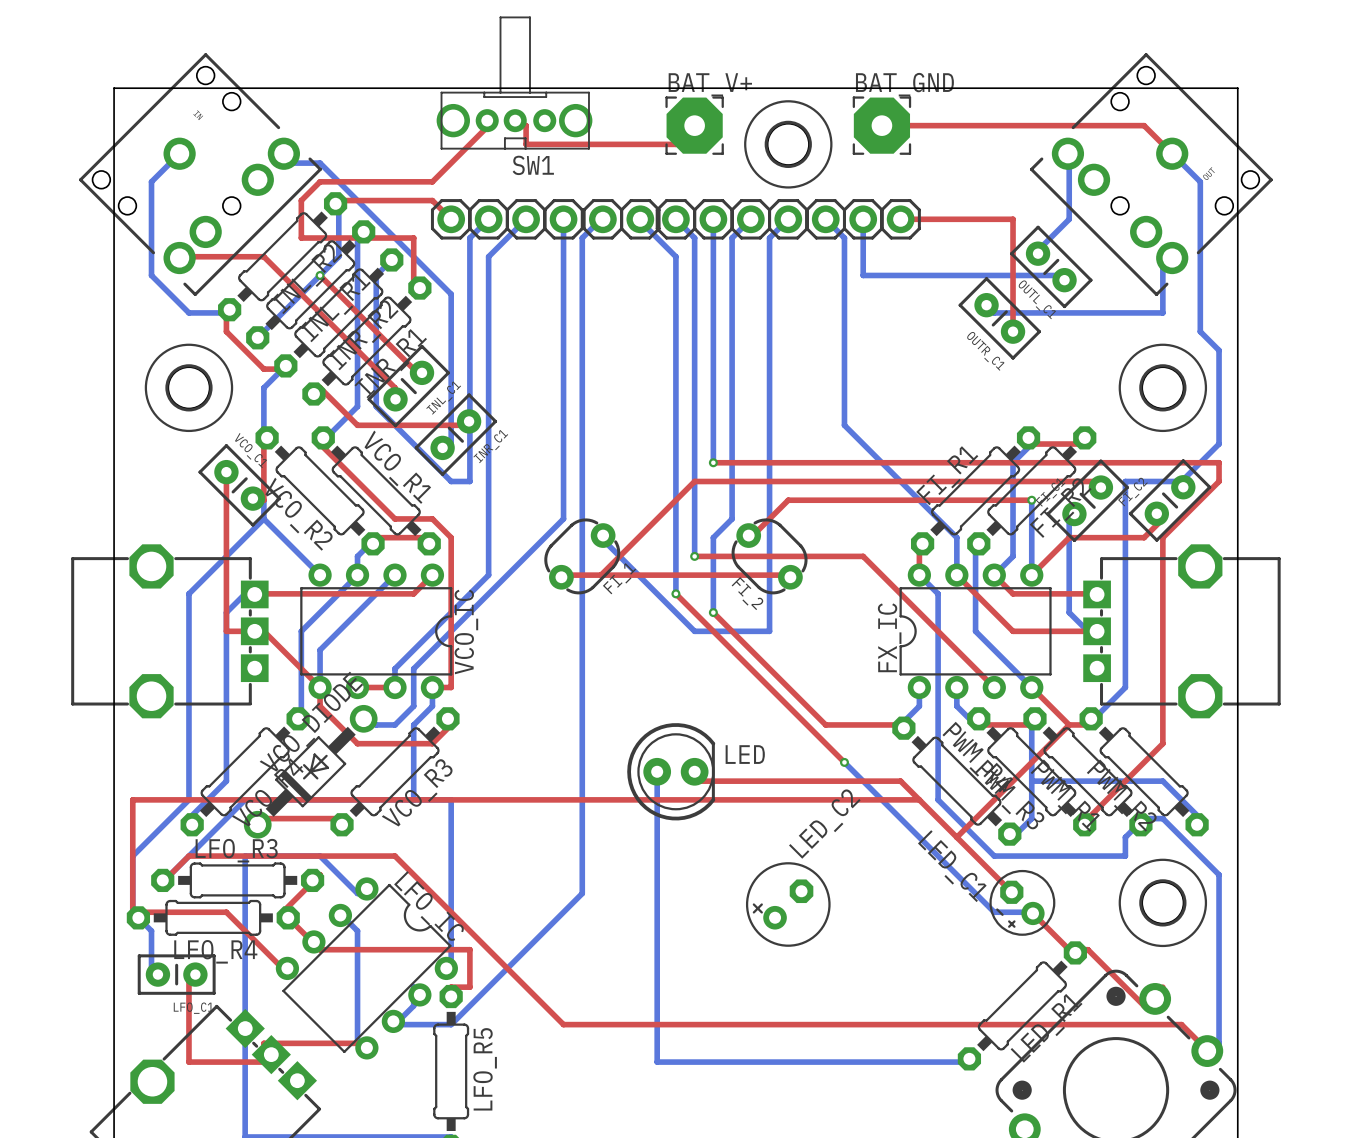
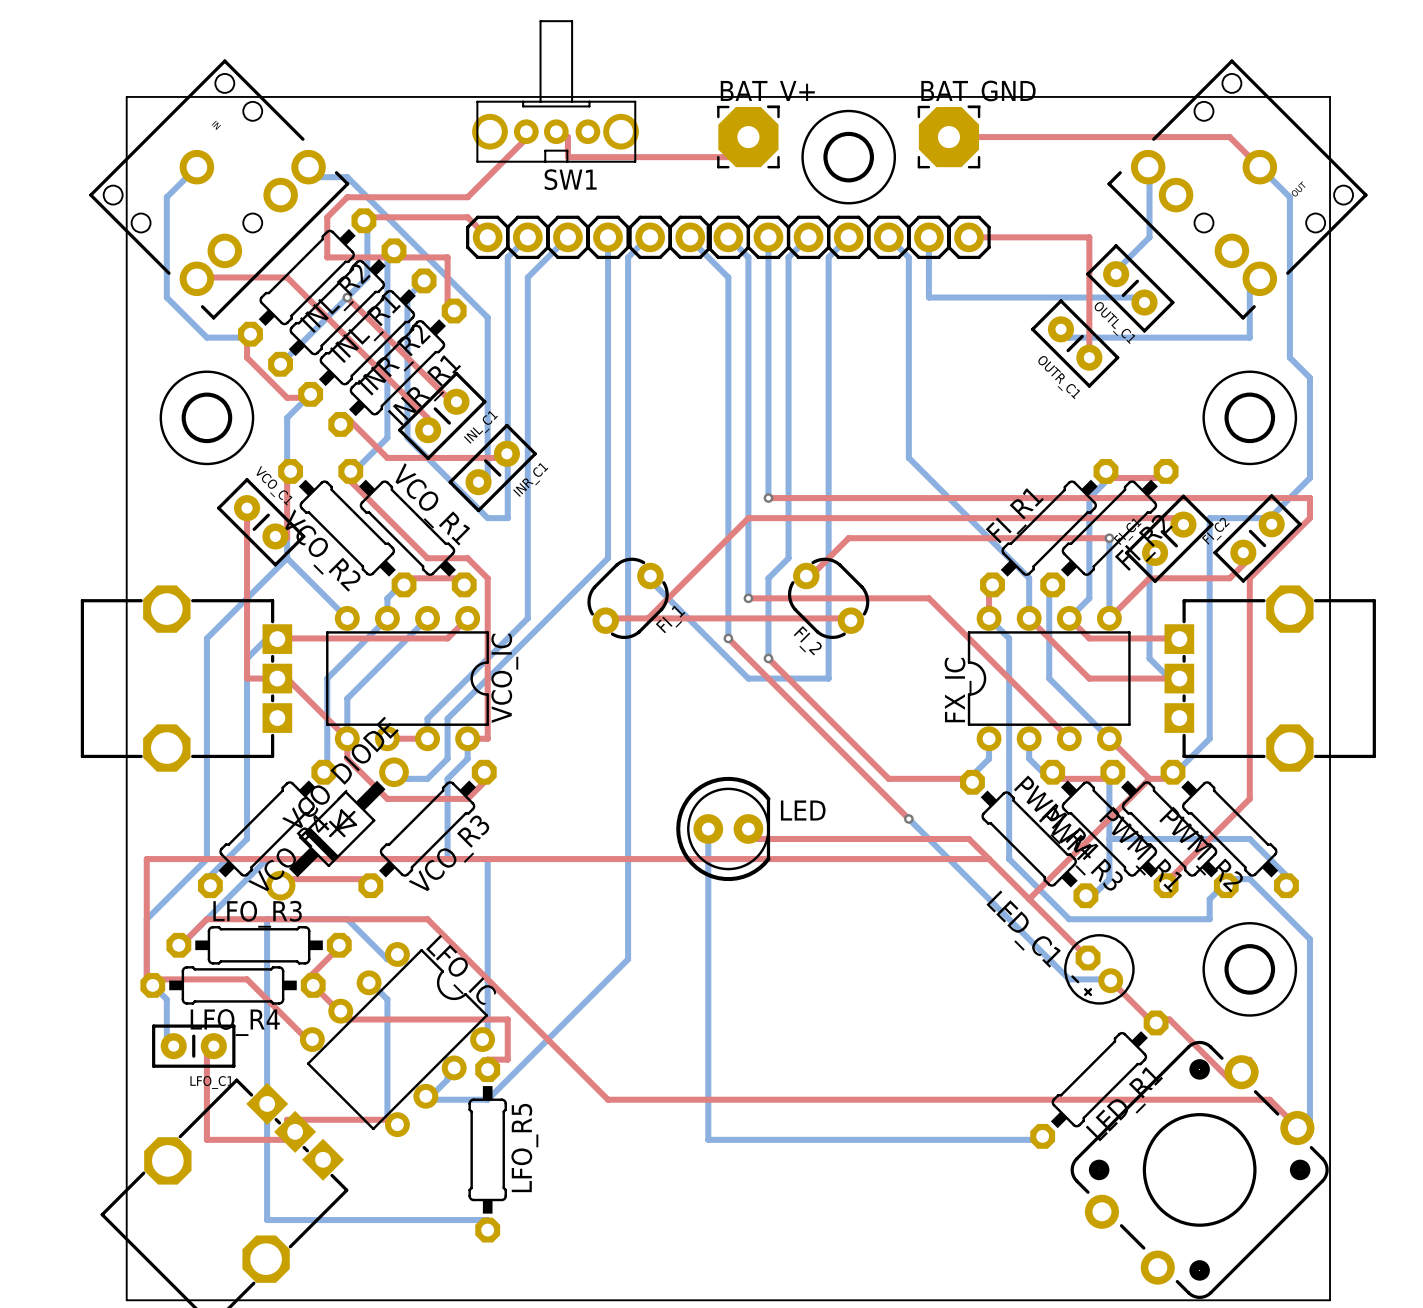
LED_C2: (788, 904) -> none

